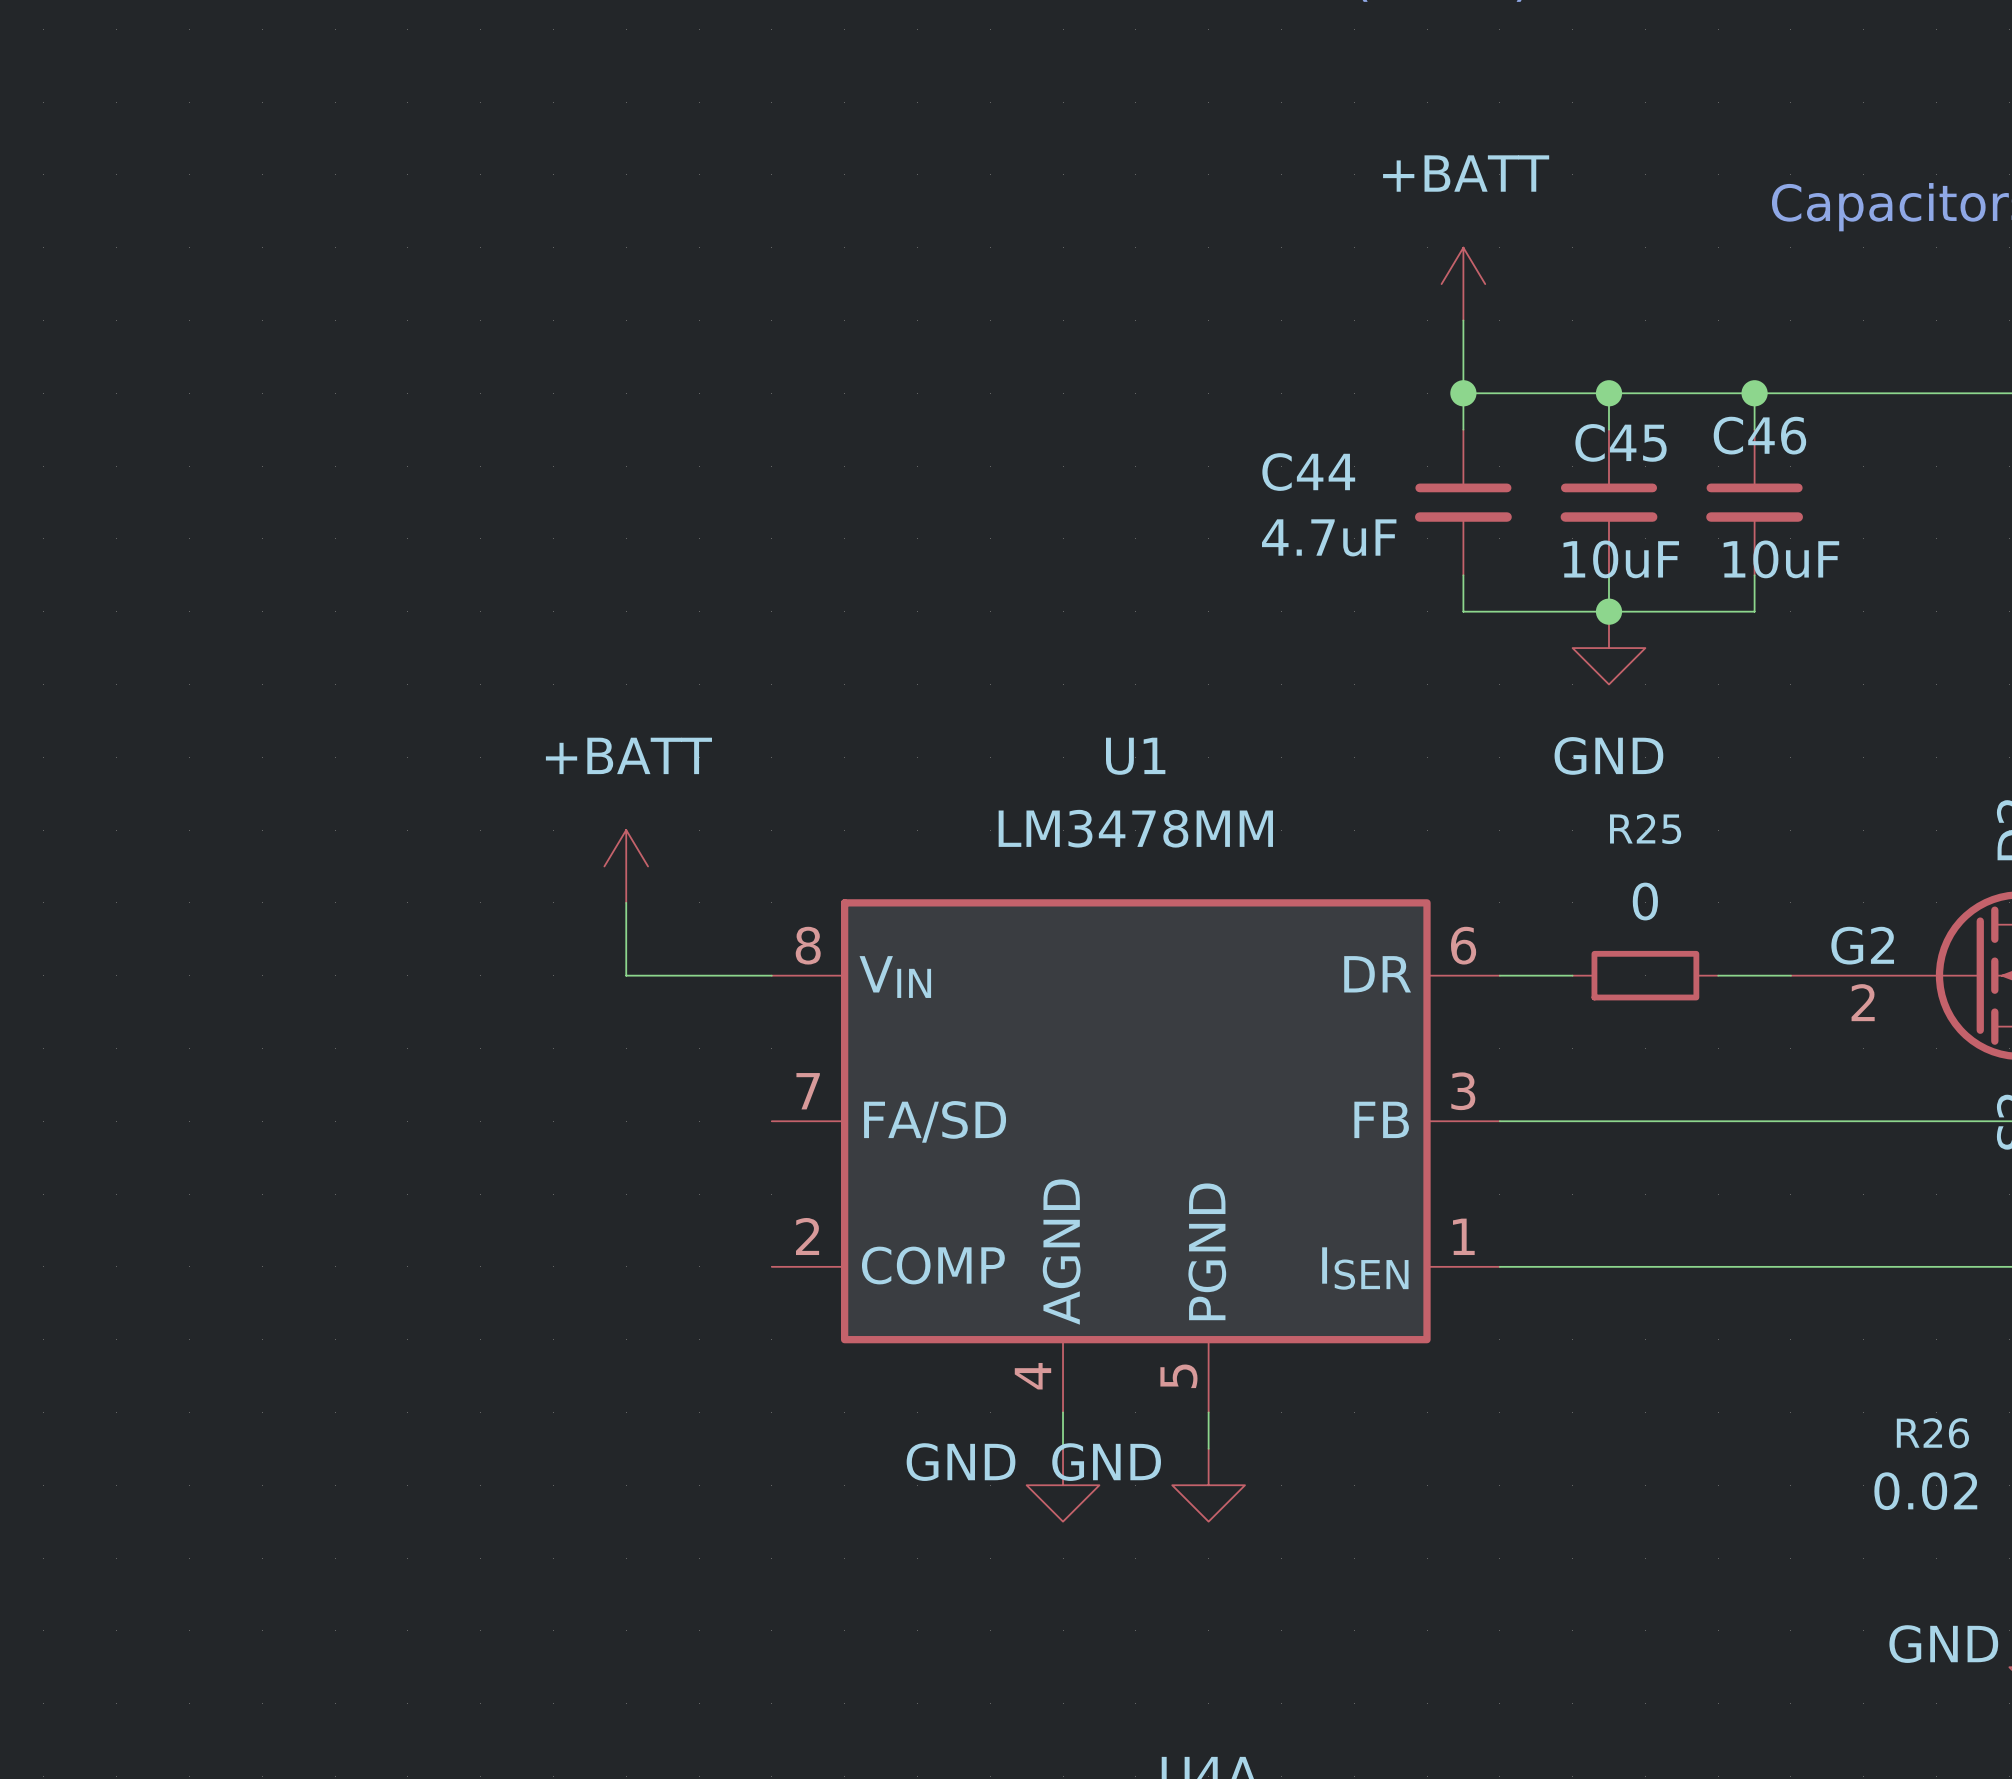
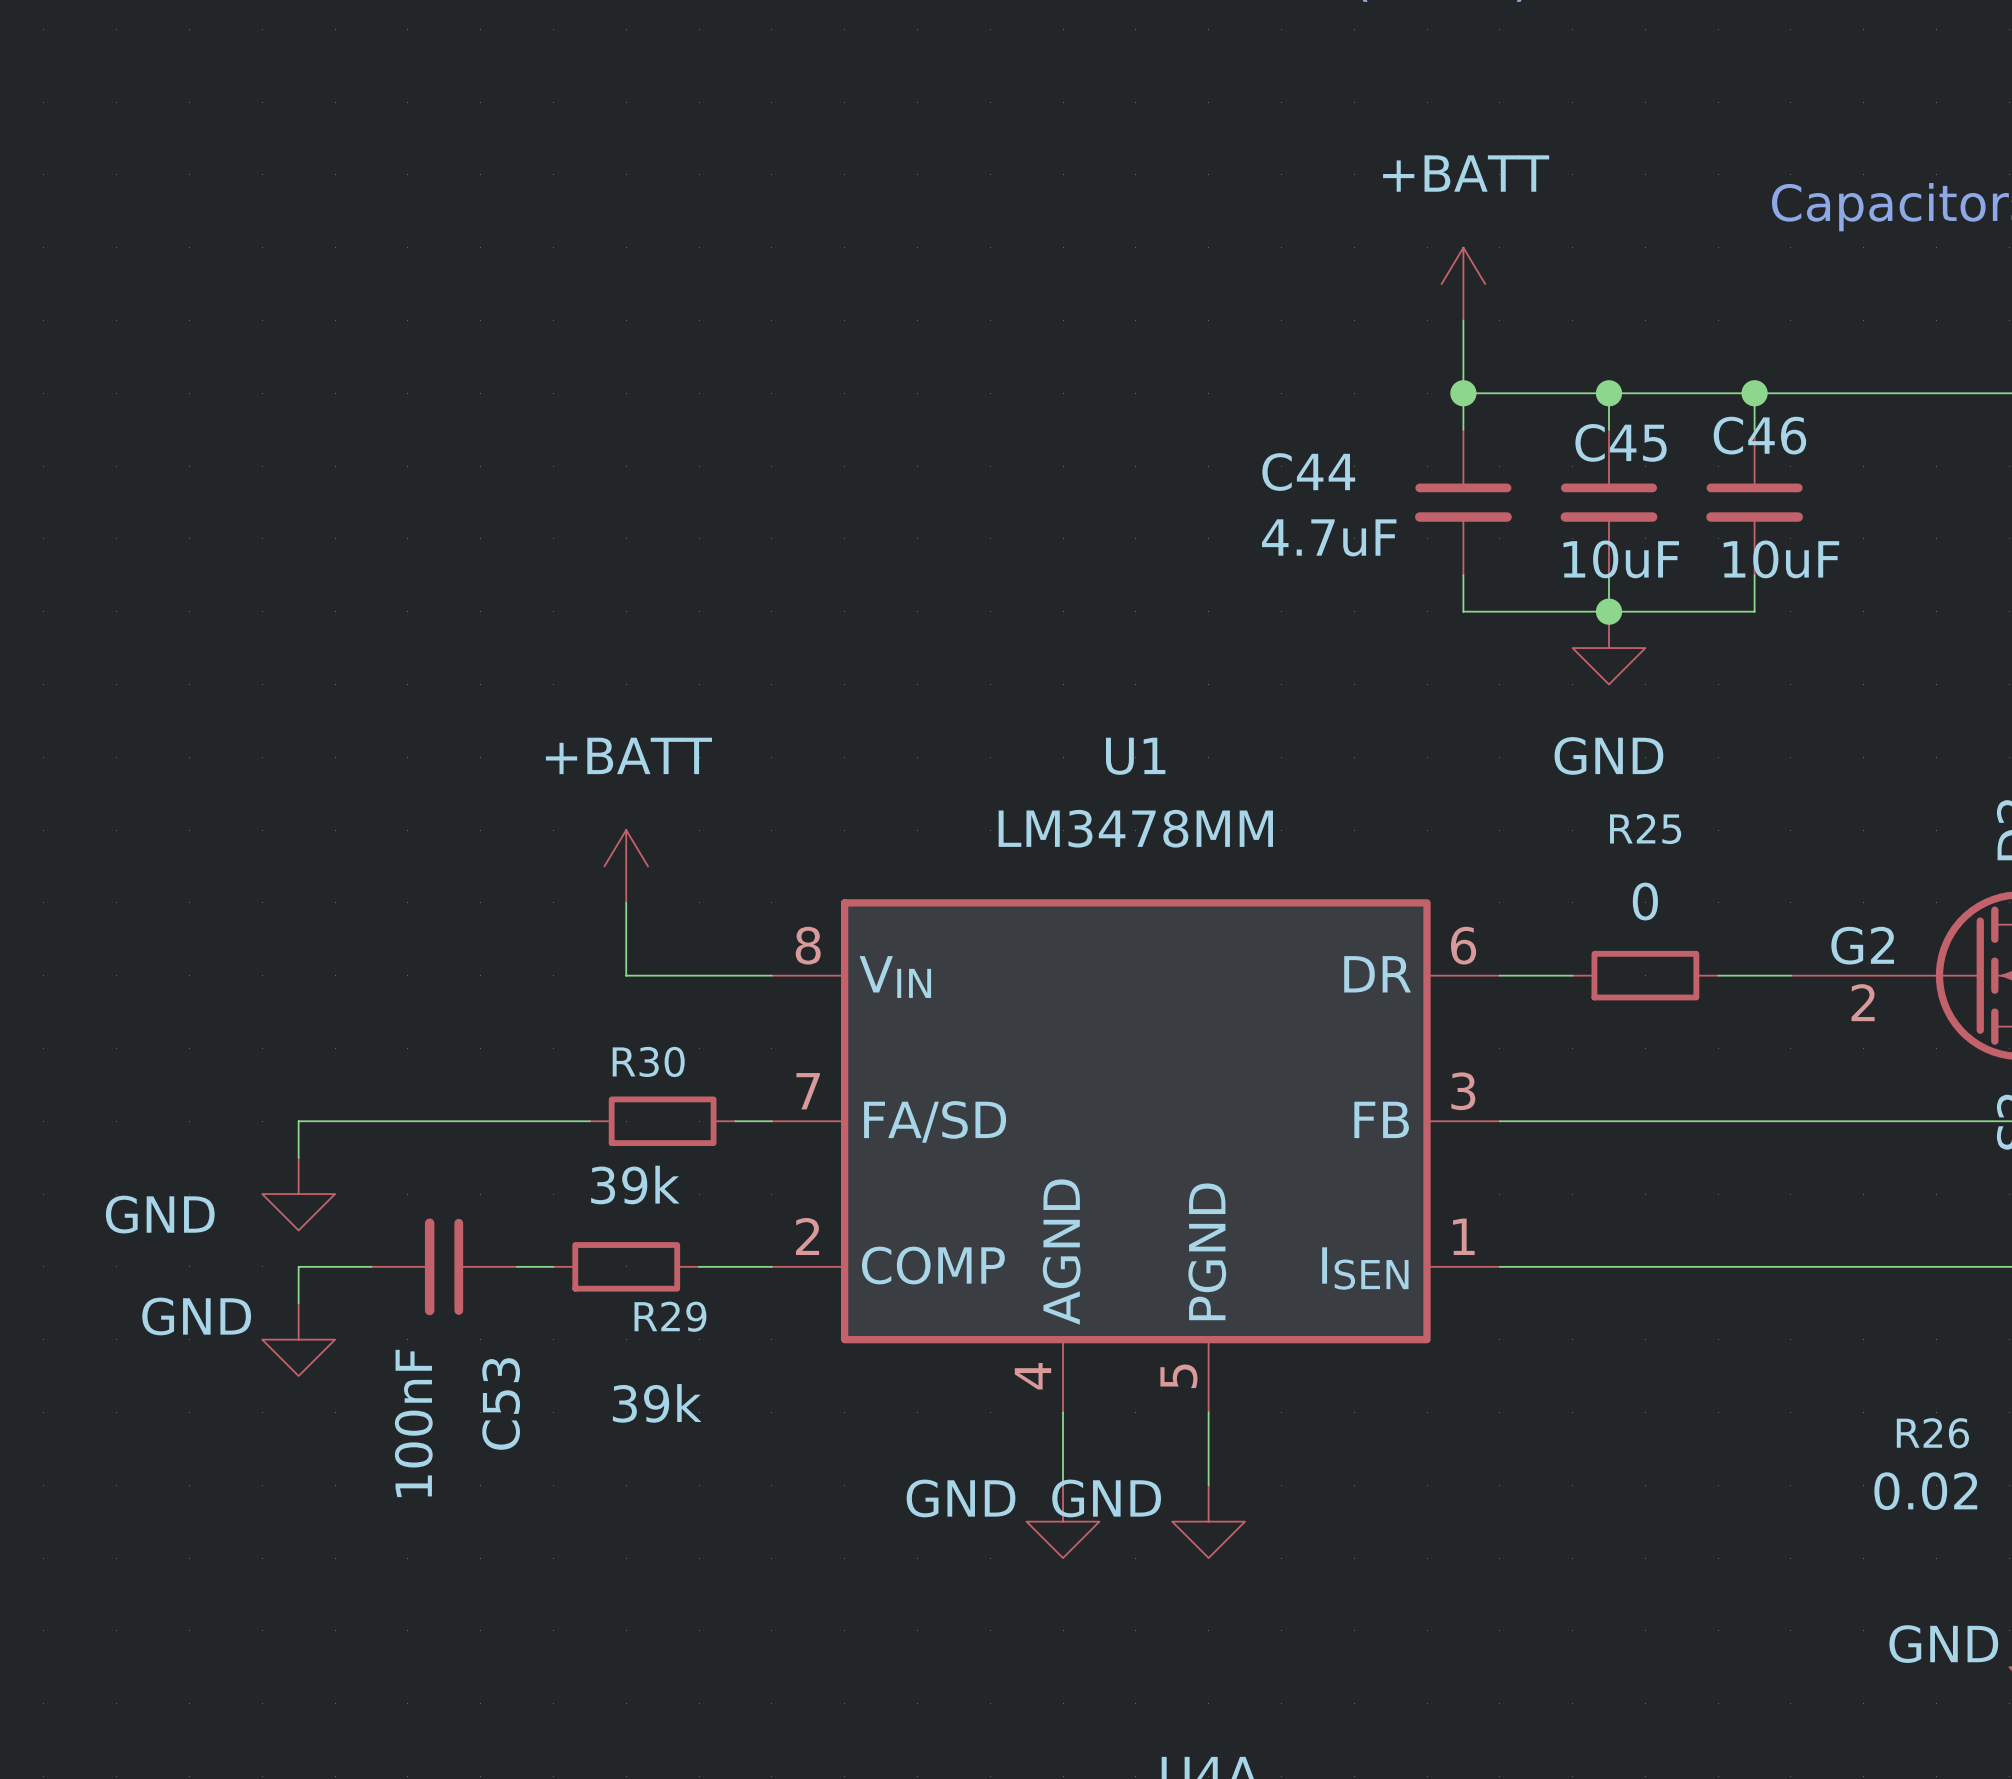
wire: none -> (589, 1121) (298, 1121) (298, 1157)
R30: none -> 39k (662, 1121)
wire: none -> (735, 1121) (771, 1121)
power symbol: none -> GND (298, 1194)
wire: none -> (371, 1266) (298, 1266) (298, 1303)
C53: none -> 100nF (444, 1266)
wire: none -> (517, 1266) (553, 1266)
R29: none -> 39k (626, 1266)
wire: none -> (699, 1266) (771, 1266)
power symbol: none -> GND (298, 1339)
power symbol position: GND (1063, 1485) -> GND (1063, 1521)
power symbol position: GND (1208, 1485) -> GND (1208, 1521)

